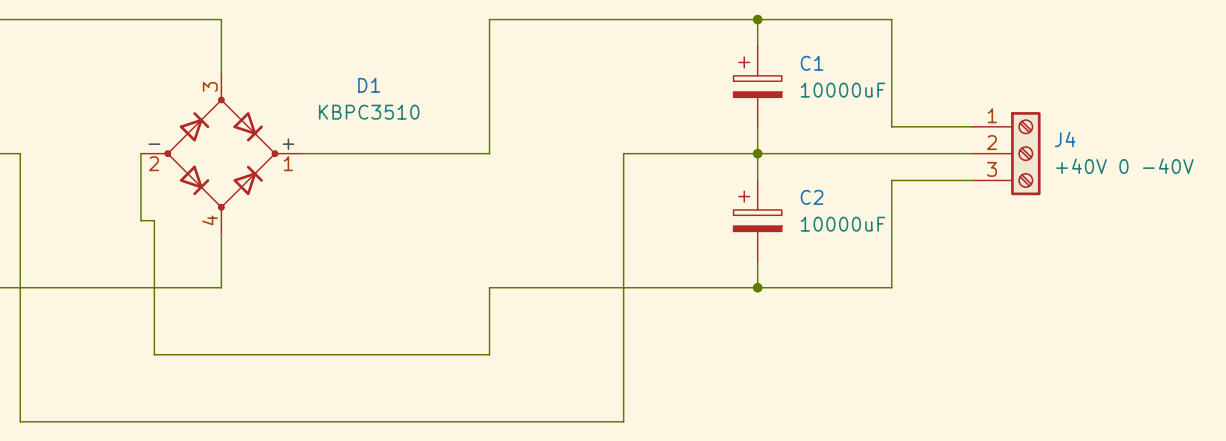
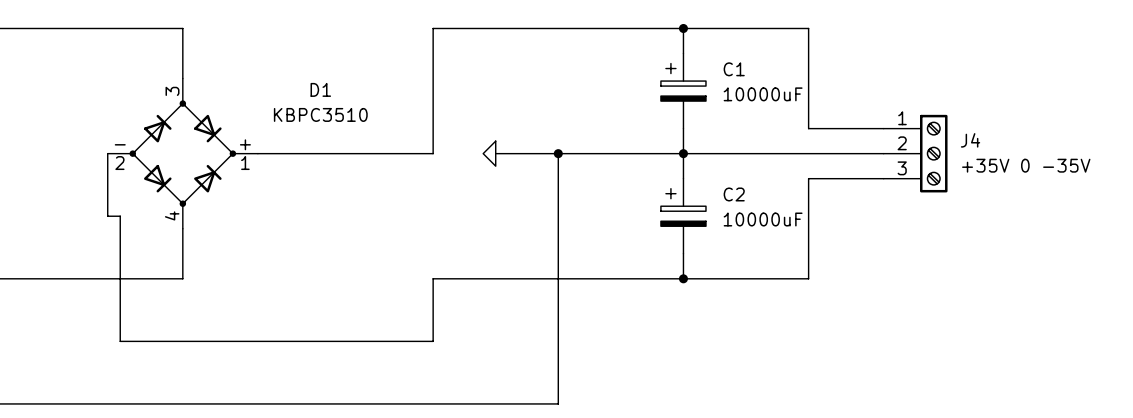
power symbol: none -> (489, 153)
wire: none -> (495, 153) (558, 153)
junction: none -> (558, 153)
J4 value: +40V 0 -40V (1124, 166) -> +35V 0 -35V (1026, 165)

